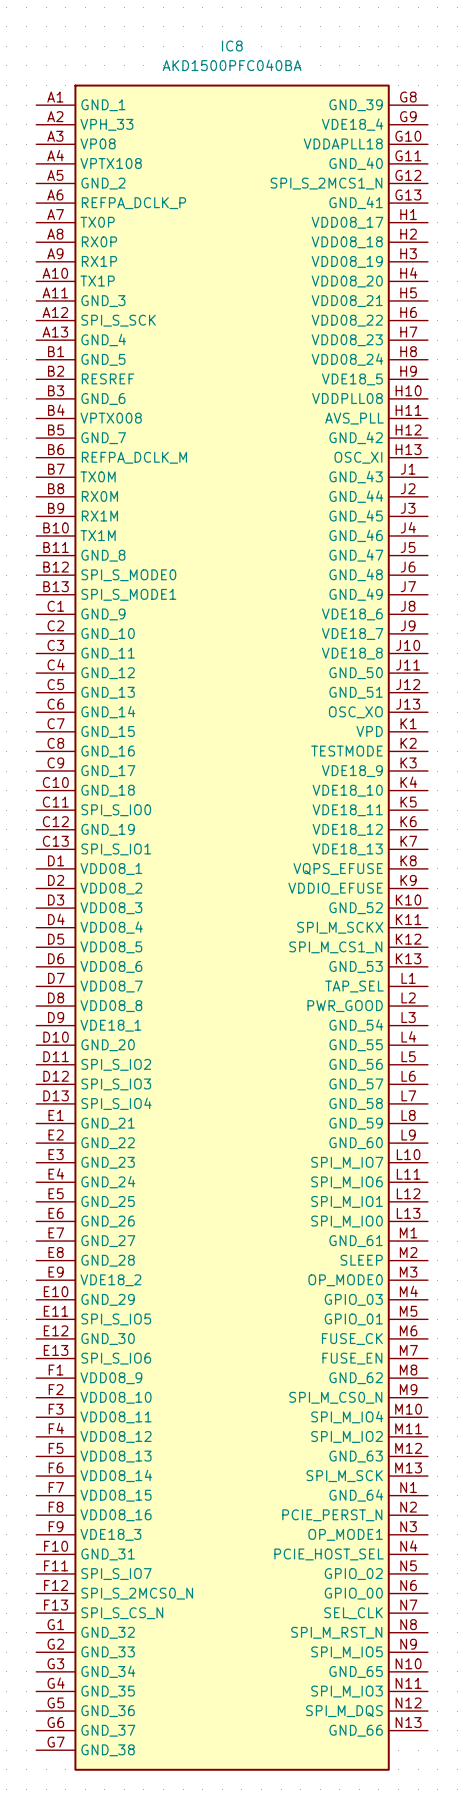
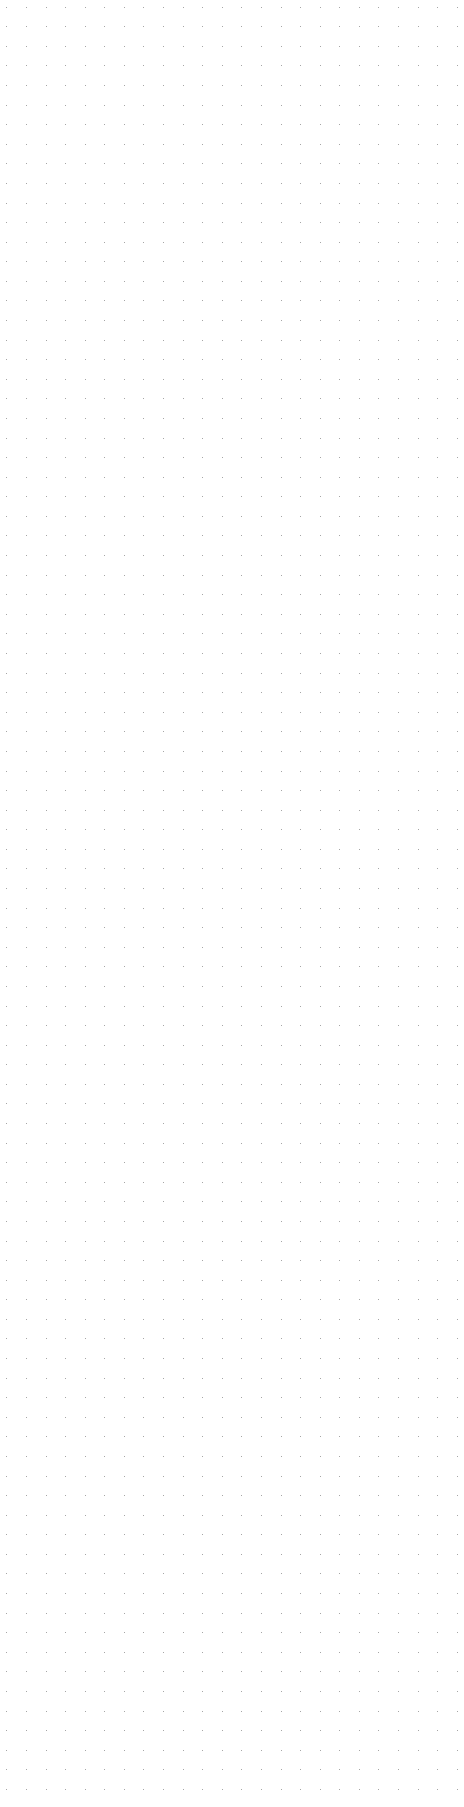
IC8: AKD1500PFC040BA (232, 927) -> none

